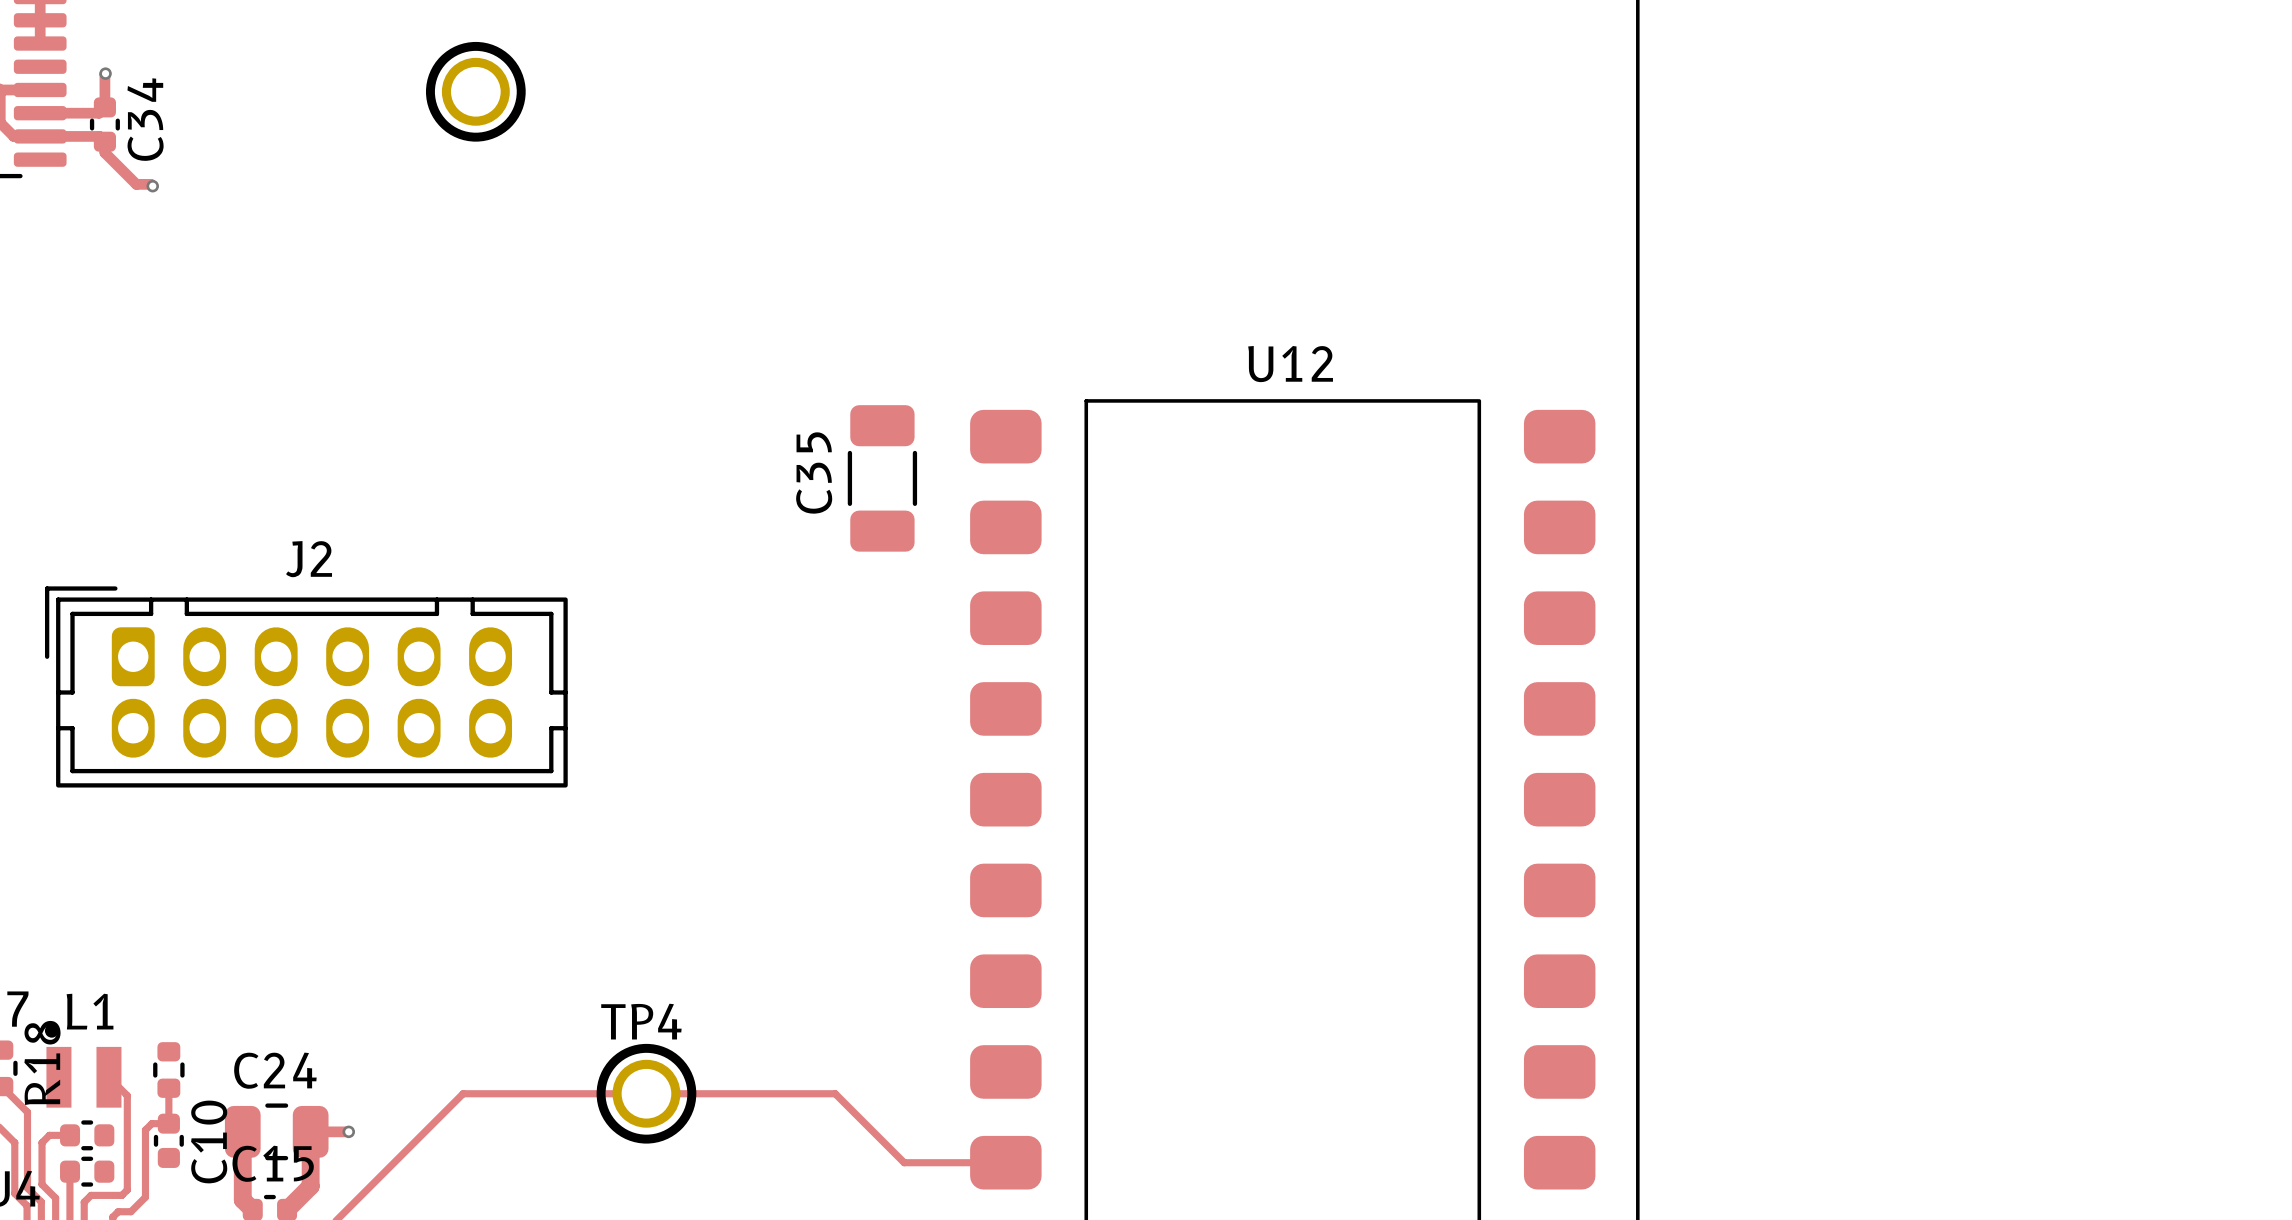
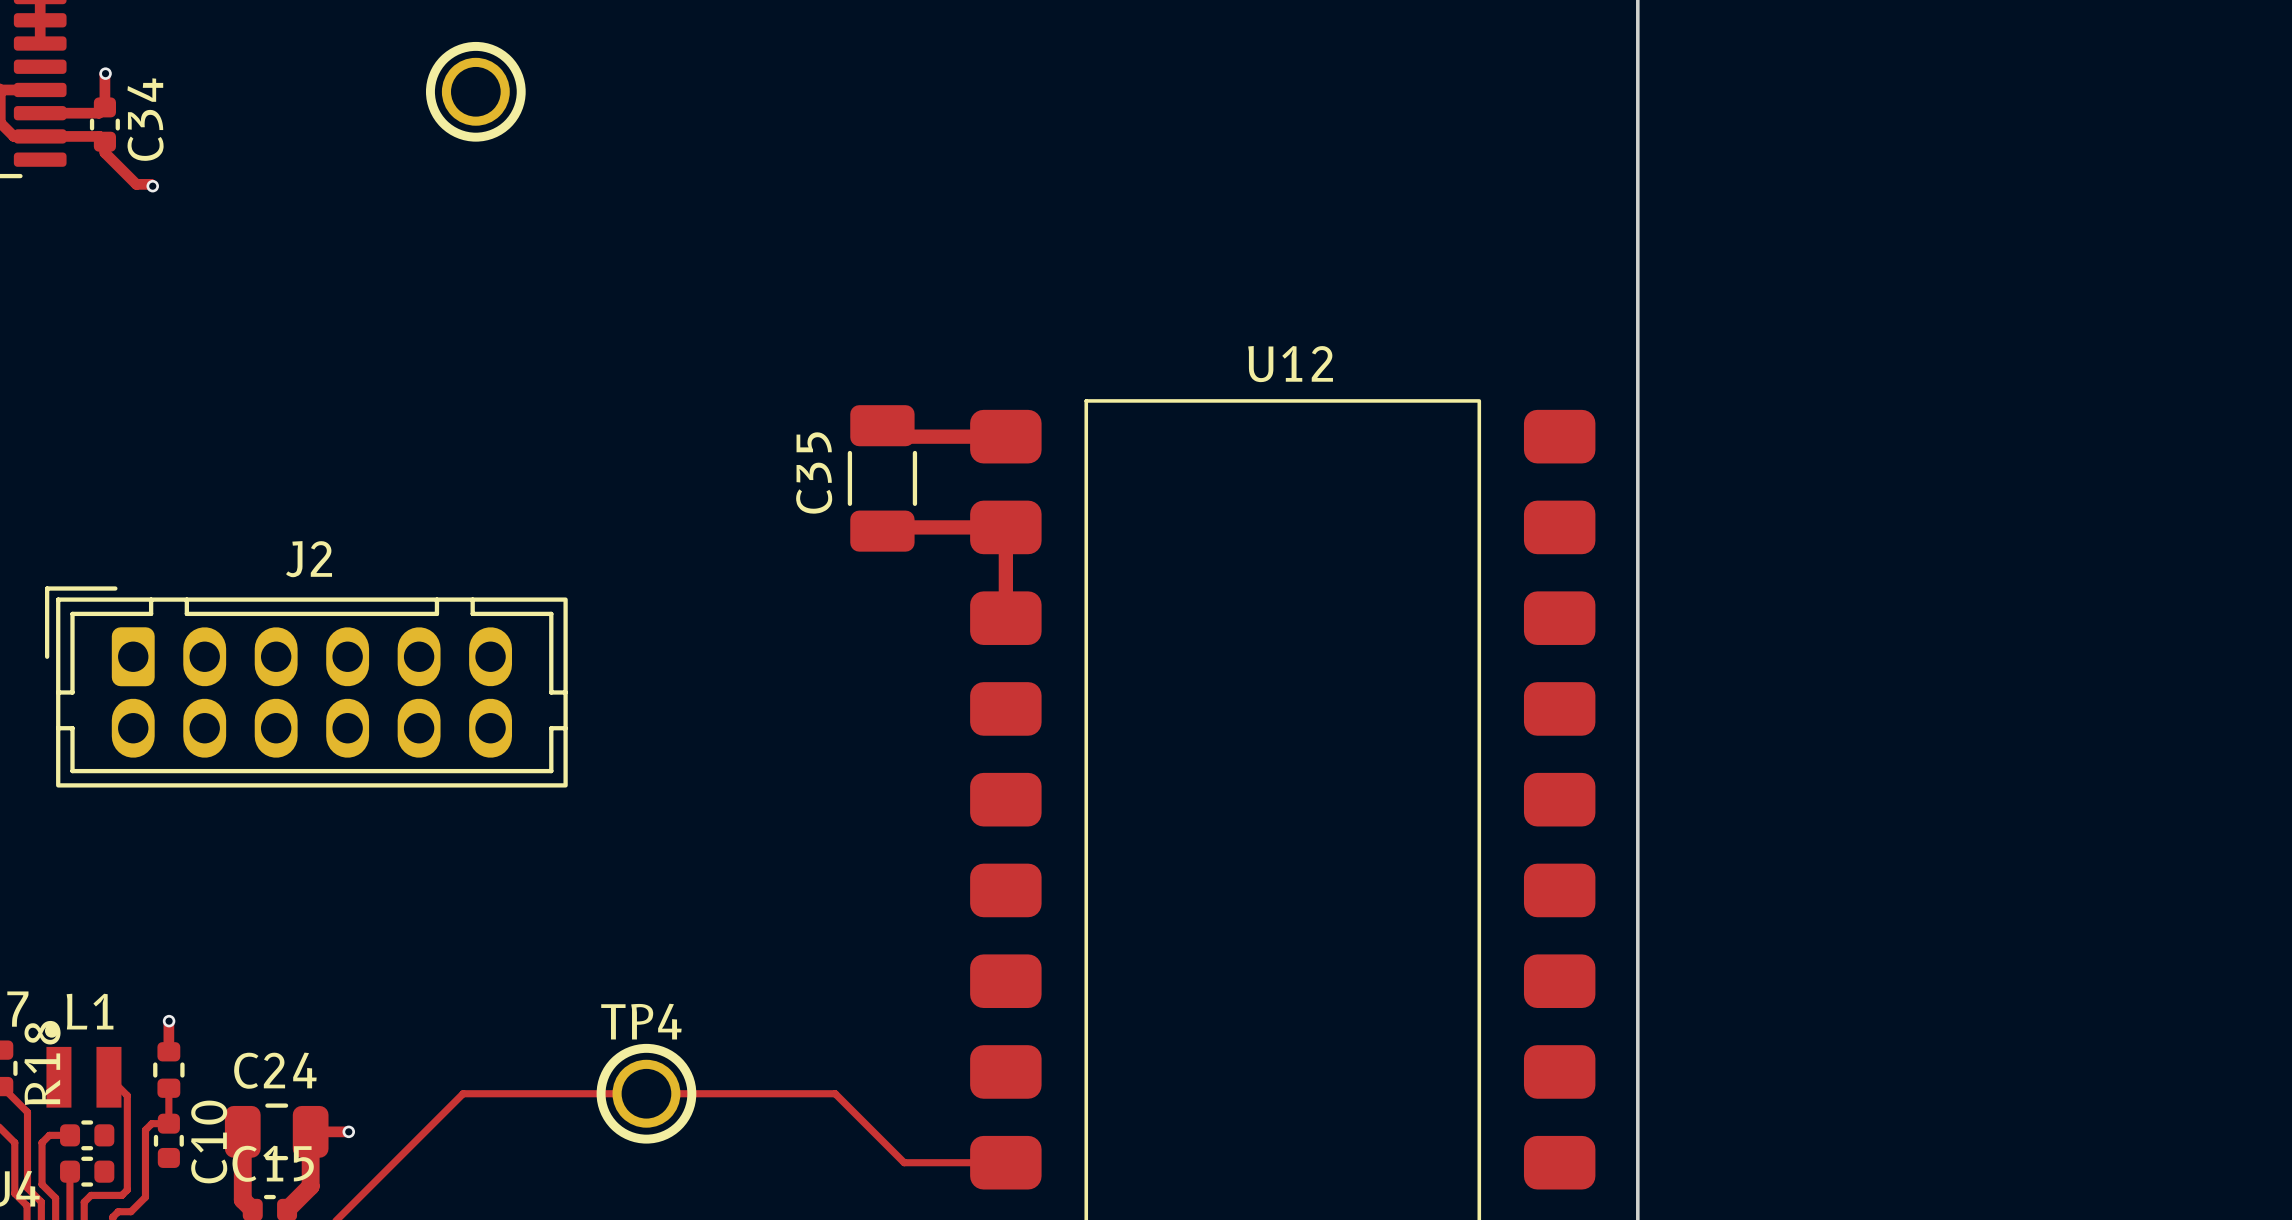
track: none -> (882, 425) (893, 436) (1005, 436)
track: none -> (882, 531) (886, 527) (1005, 527) (1005, 618)
track: none -> (168, 1021) (168, 1051)
via: none -> (169, 1021)

